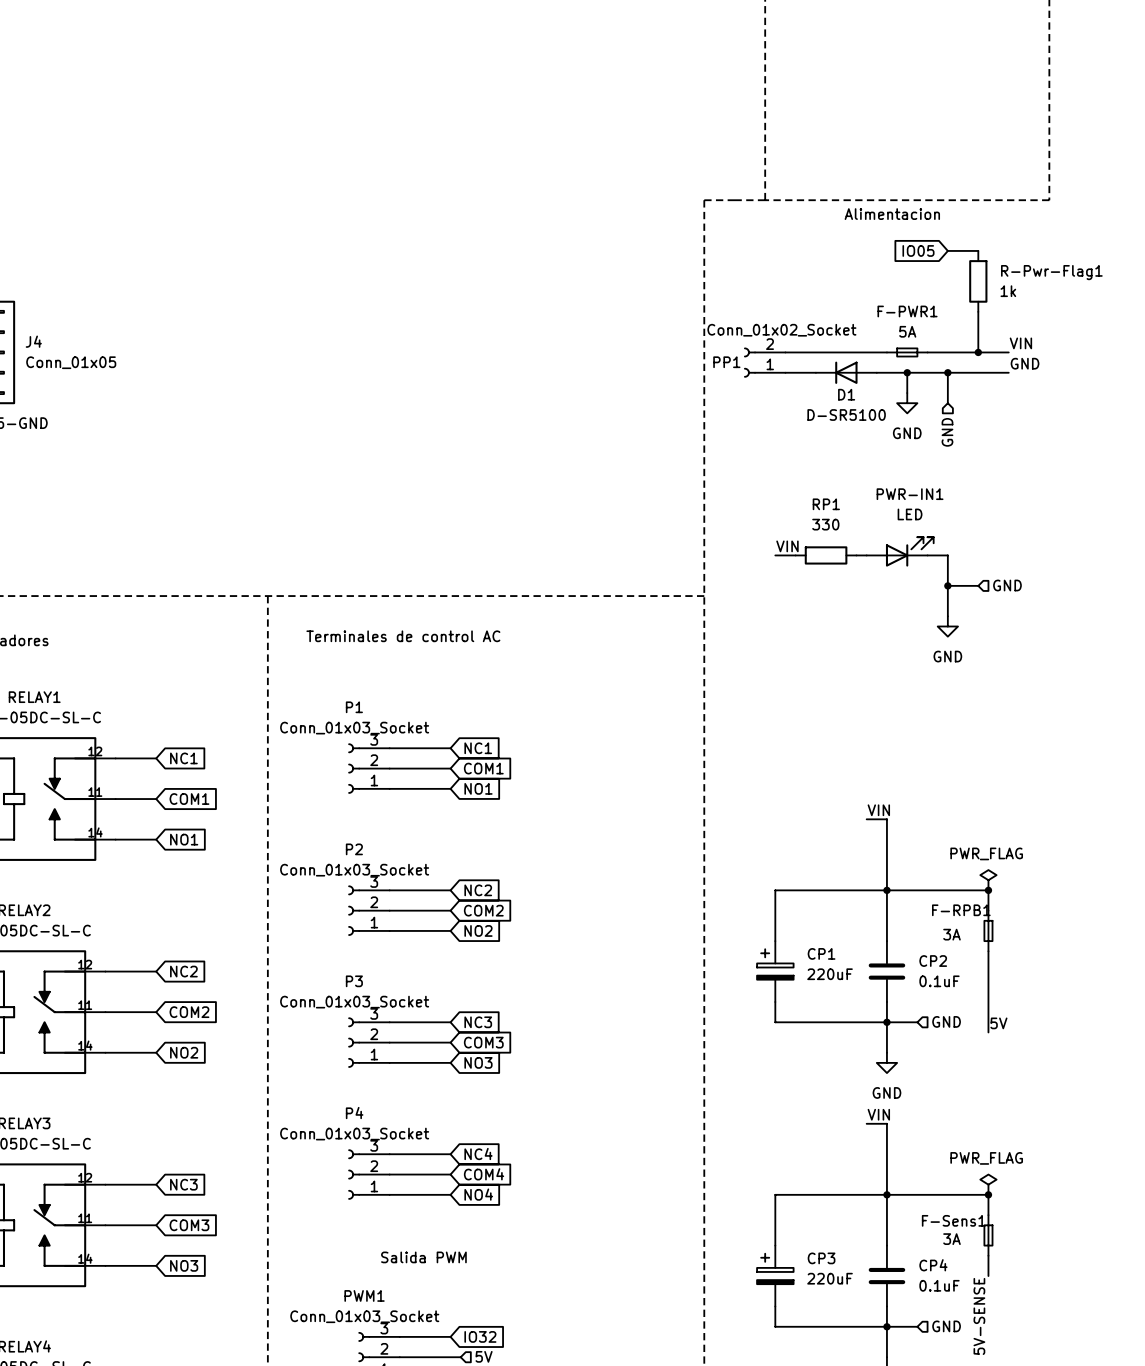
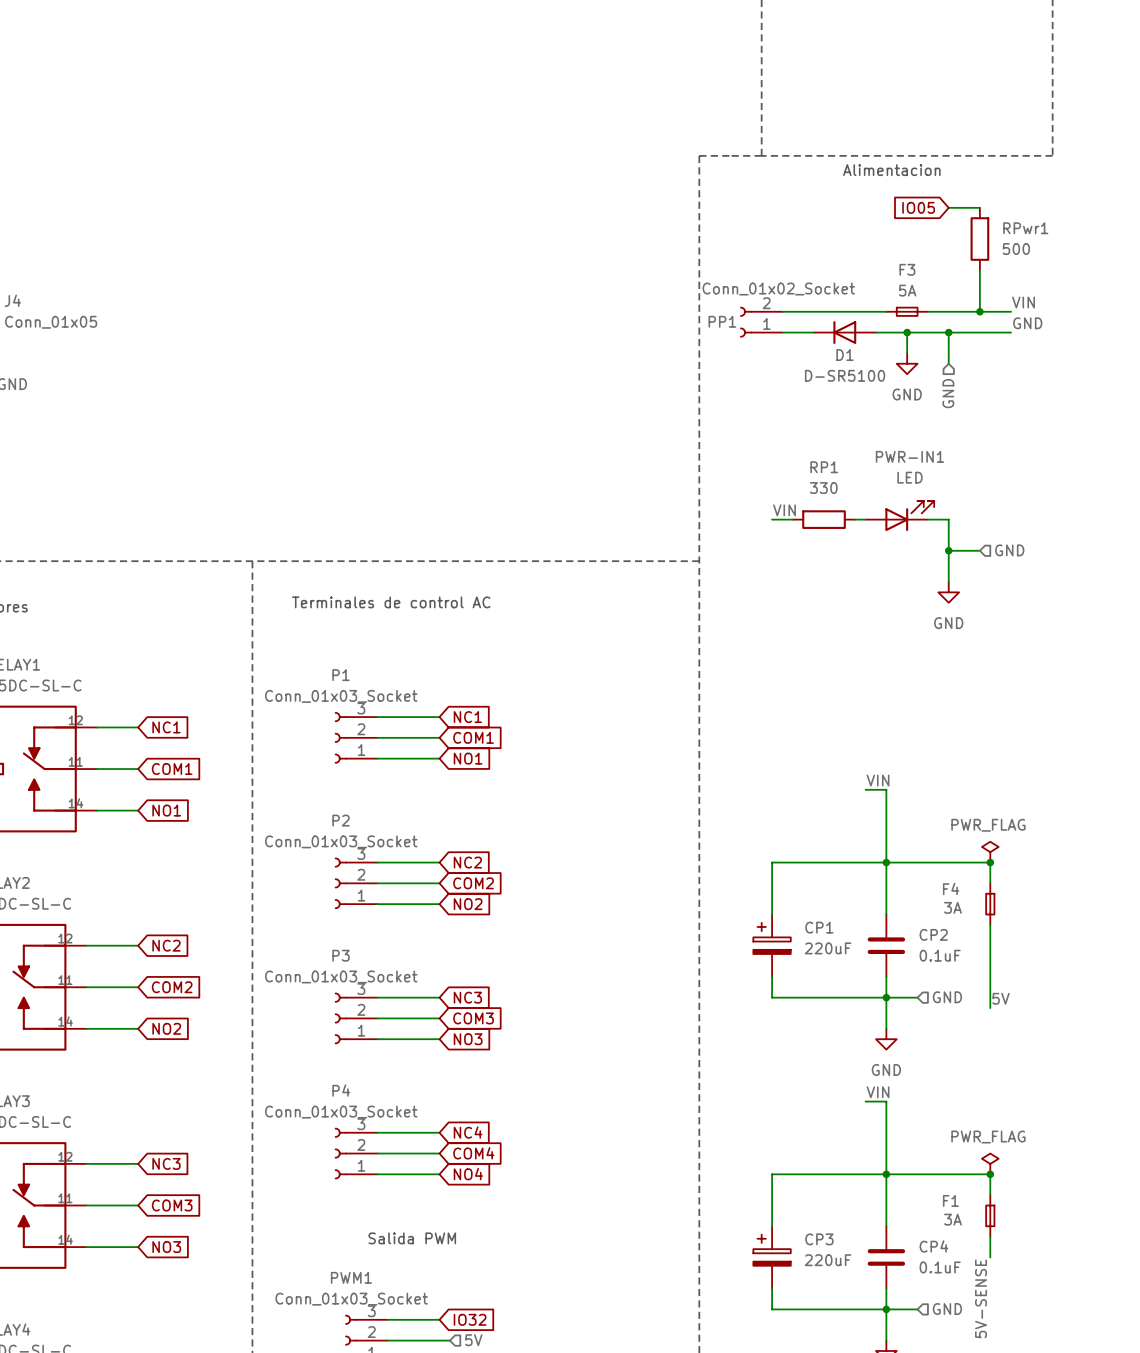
R-Pwr-Flag1 name: R-Pwr-Flag1 (1051, 272) -> RPwr1 (1025, 228)
R-Pwr-Flag1 value: 1k (1008, 291) -> 500 (1016, 249)
F-PWR1 name: F-PWR1 (907, 311) -> F3 (907, 269)
F-RPB1 name: F-RPB1 (961, 910) -> F4 (951, 888)
F-Sens1 name: F-Sens1 (953, 1220) -> F1 (950, 1200)

